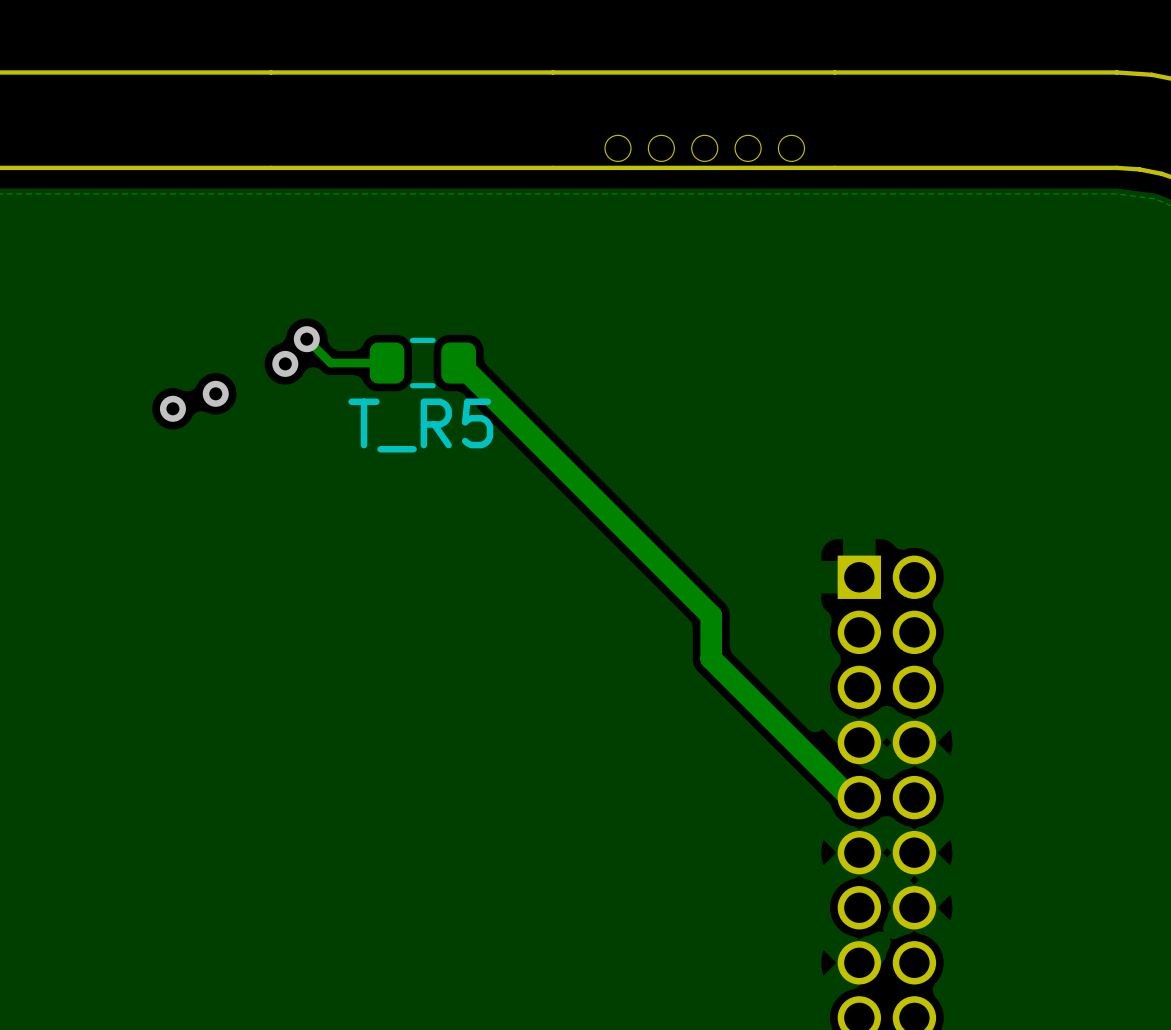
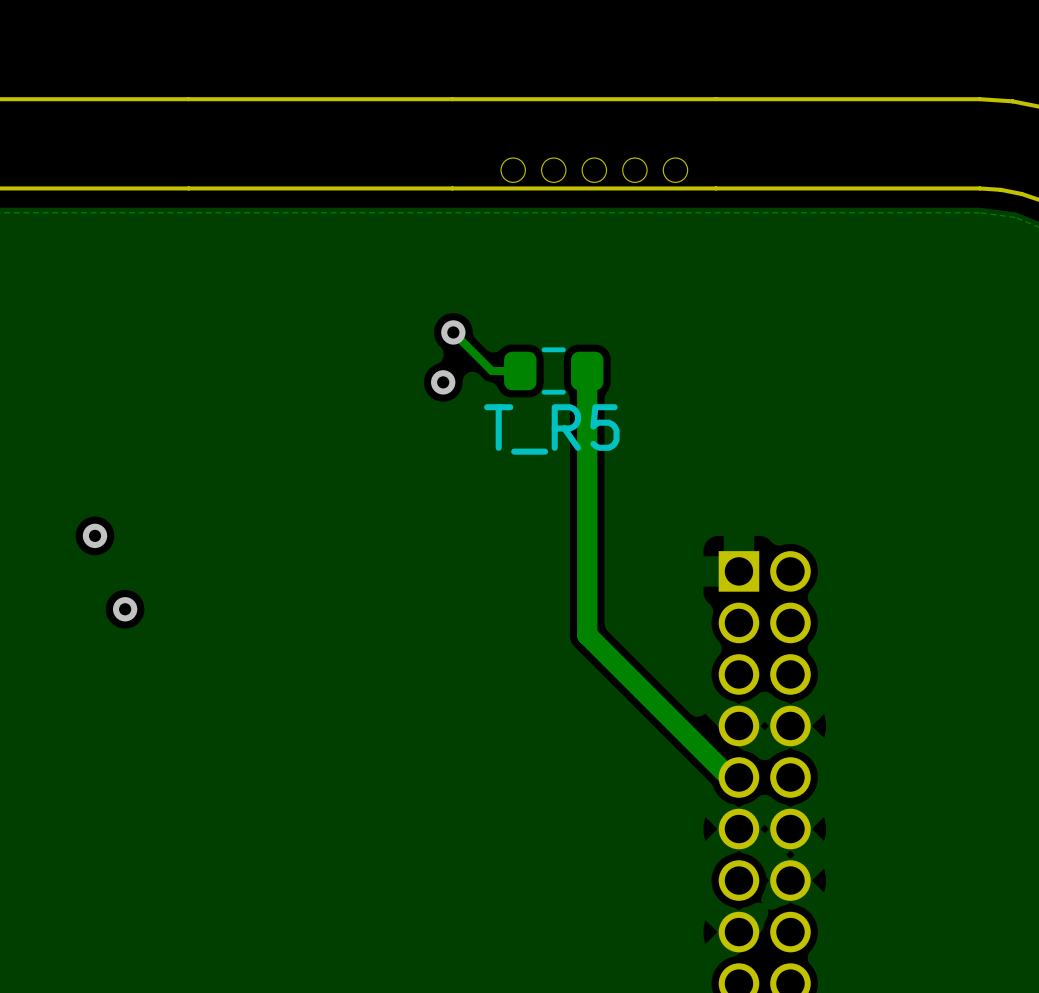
track: none -> (453, 332) (491, 371) (520, 371)
via: none -> (453, 332)
track: (306, 339) (330, 363) (387, 363) -> none
via: (306, 339) -> none
via: (285, 363) -> none
T_R5 position: (422, 363) -> (553, 371)
track: (458, 363) (711, 615) (711, 658) (850, 797) -> (587, 371) (587, 635) (729, 777)
via: none -> (443, 382)
via: (215, 393) -> none
via: (172, 408) -> none
via: none -> (95, 535)
via: none -> (125, 609)

